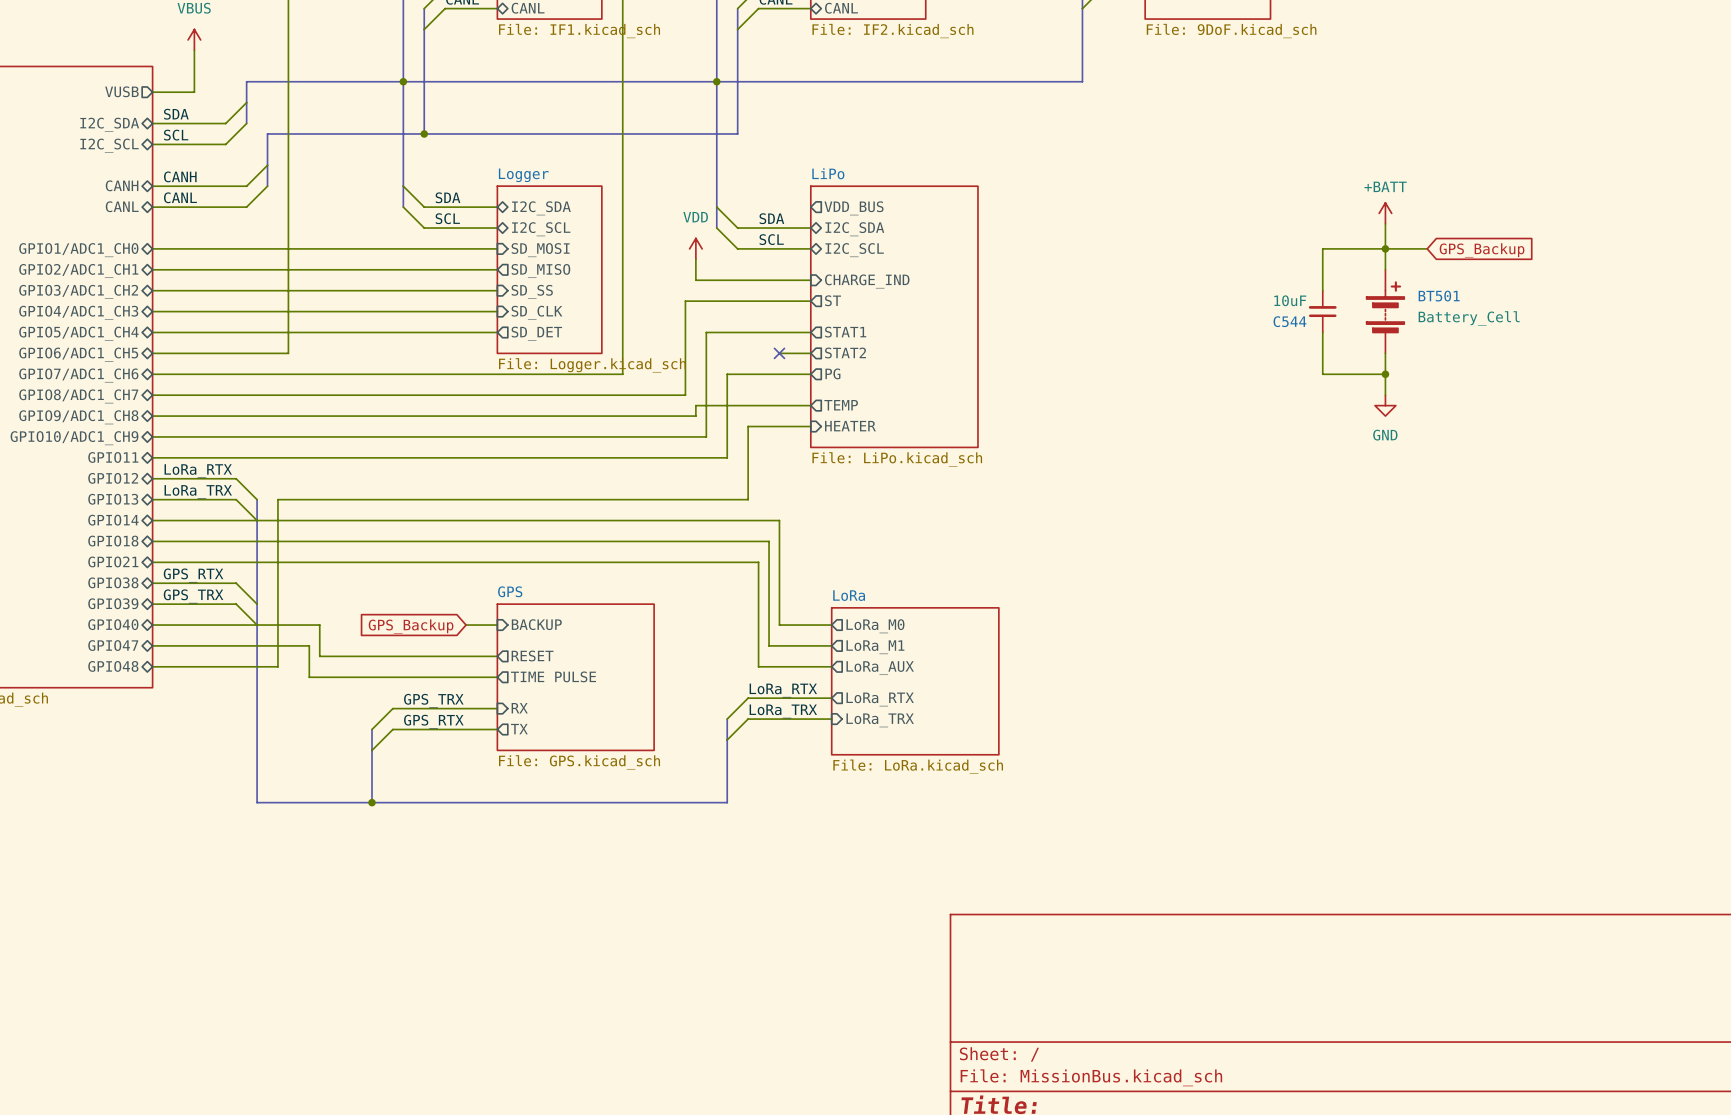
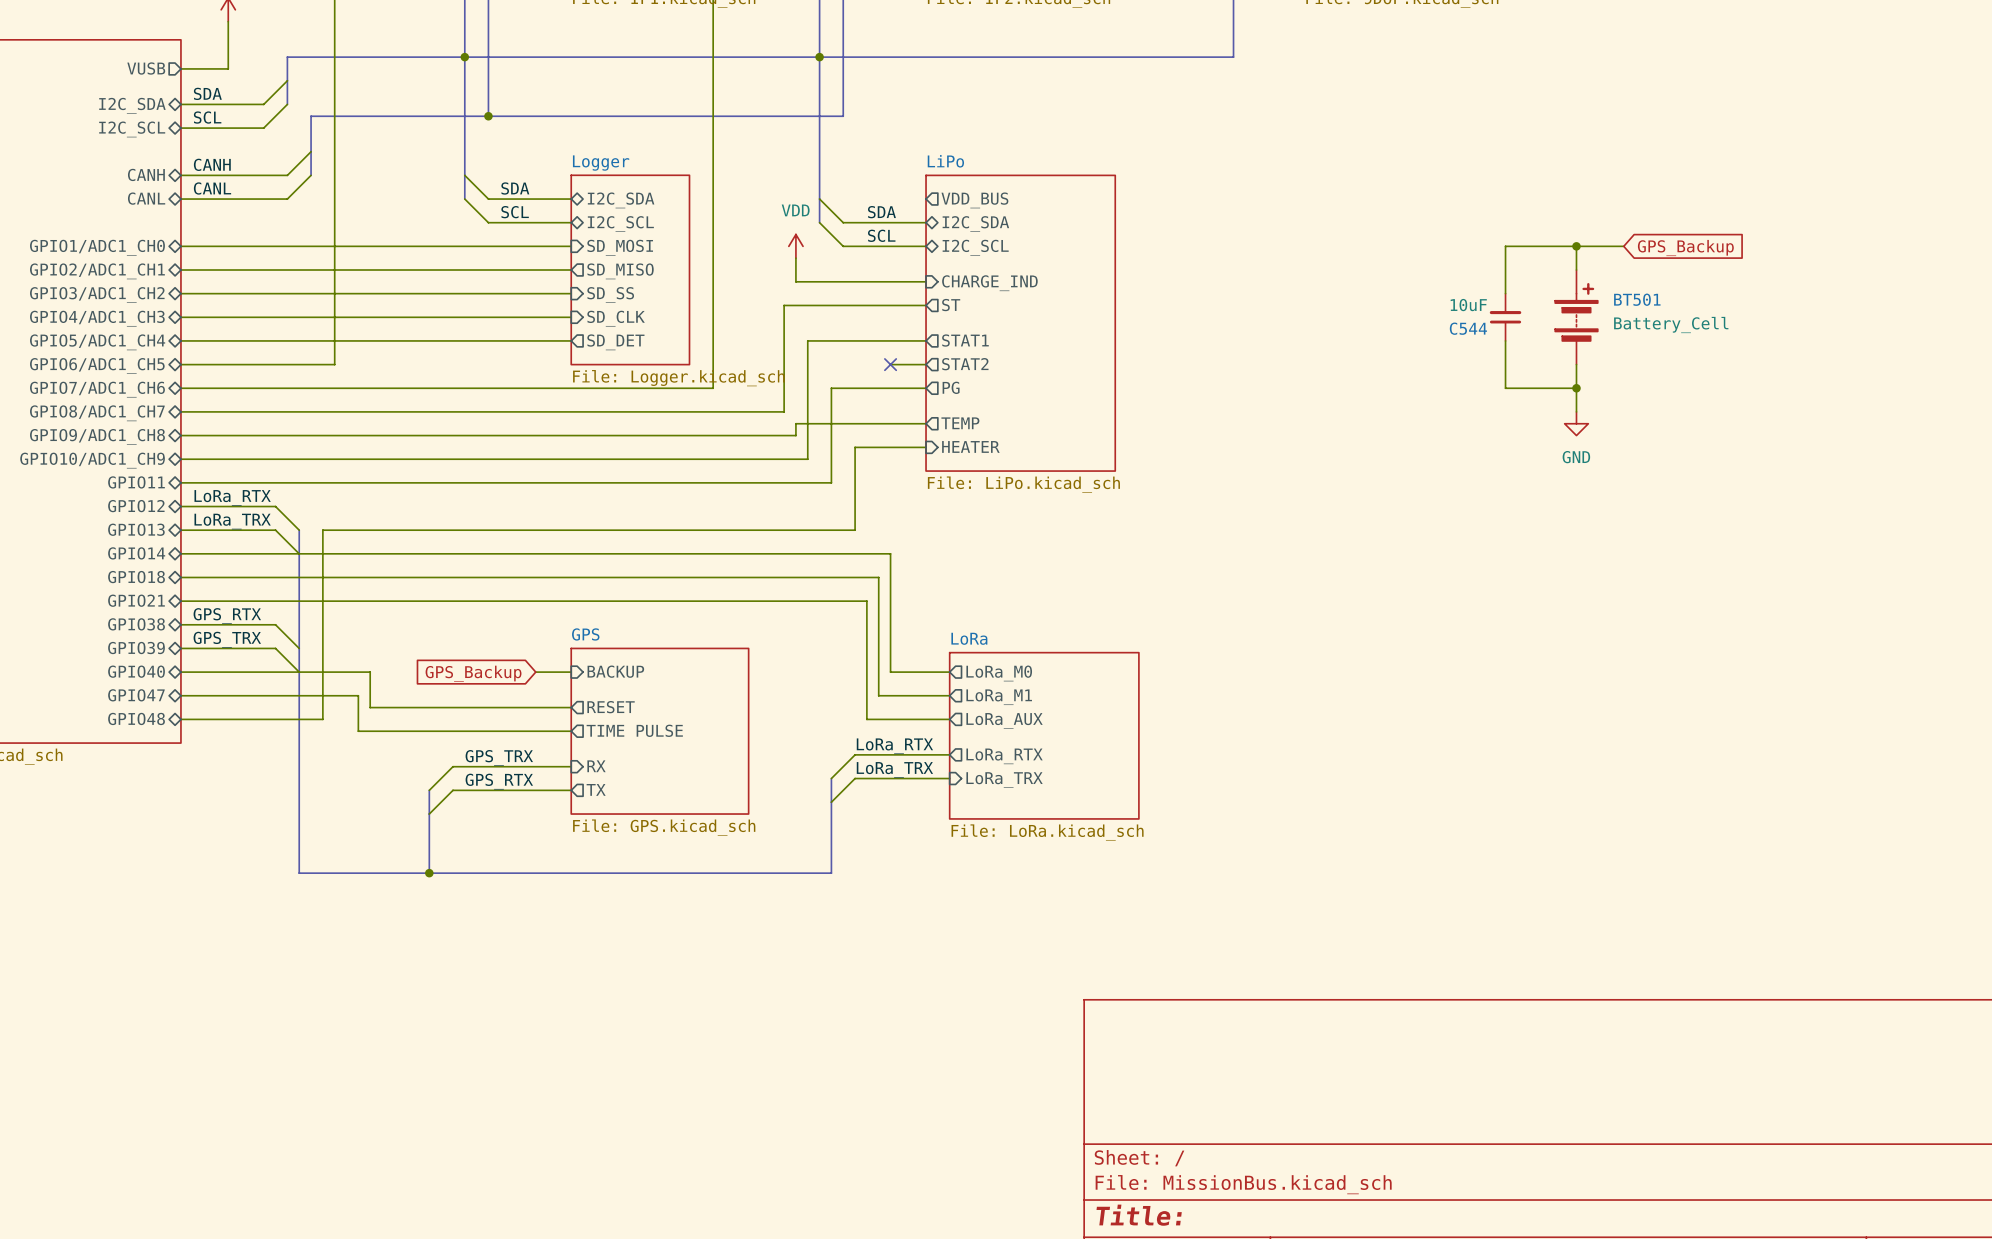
power symbol: +BATT (1385, 213) -> none
wire: (1385, 223) (1385, 248) -> none

